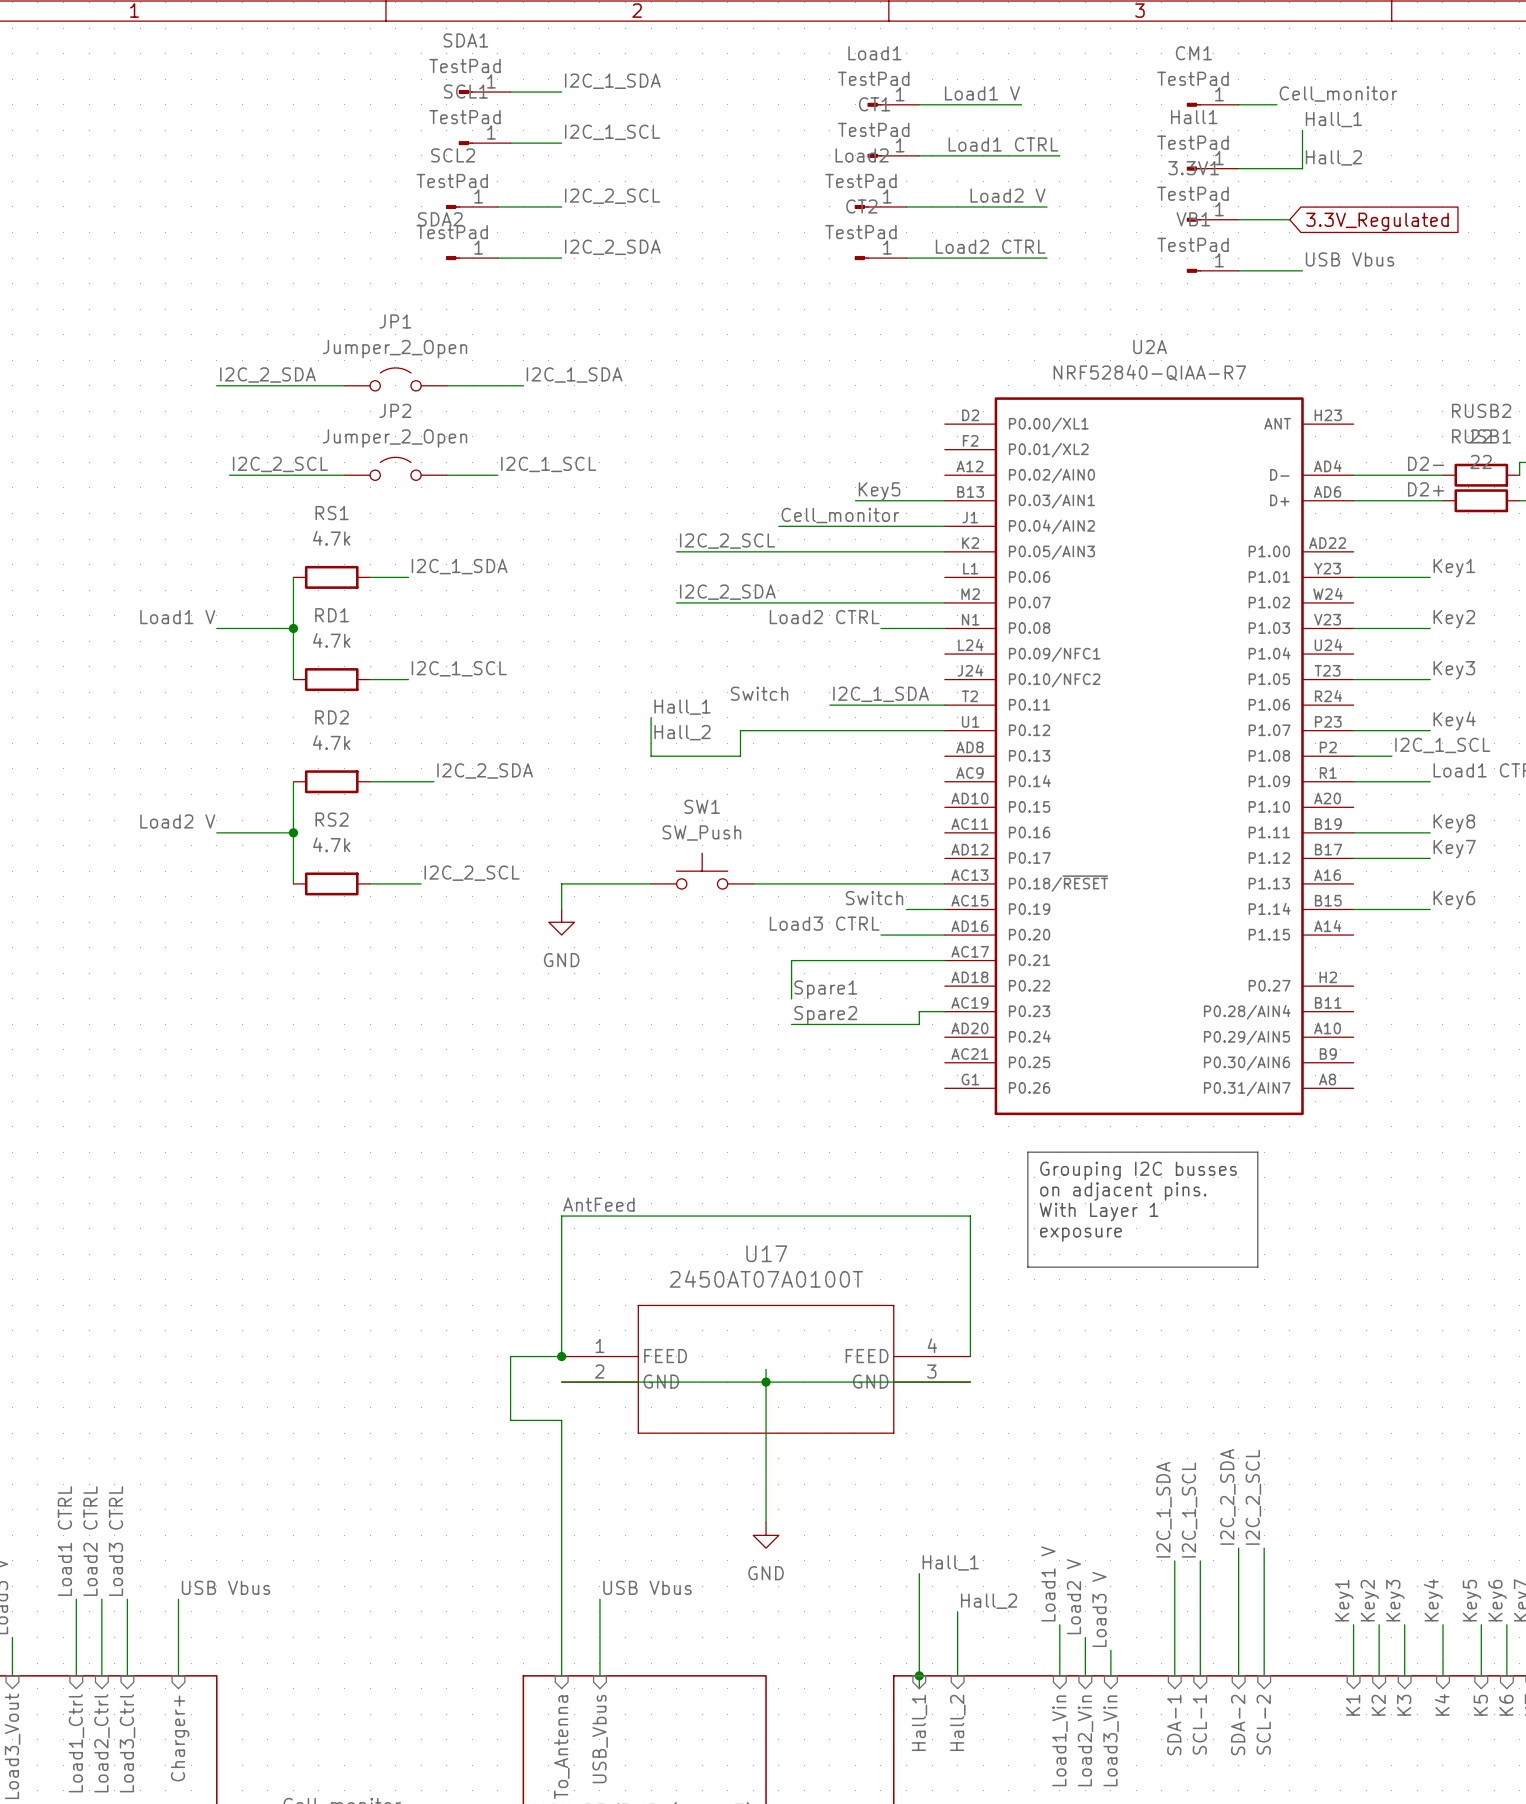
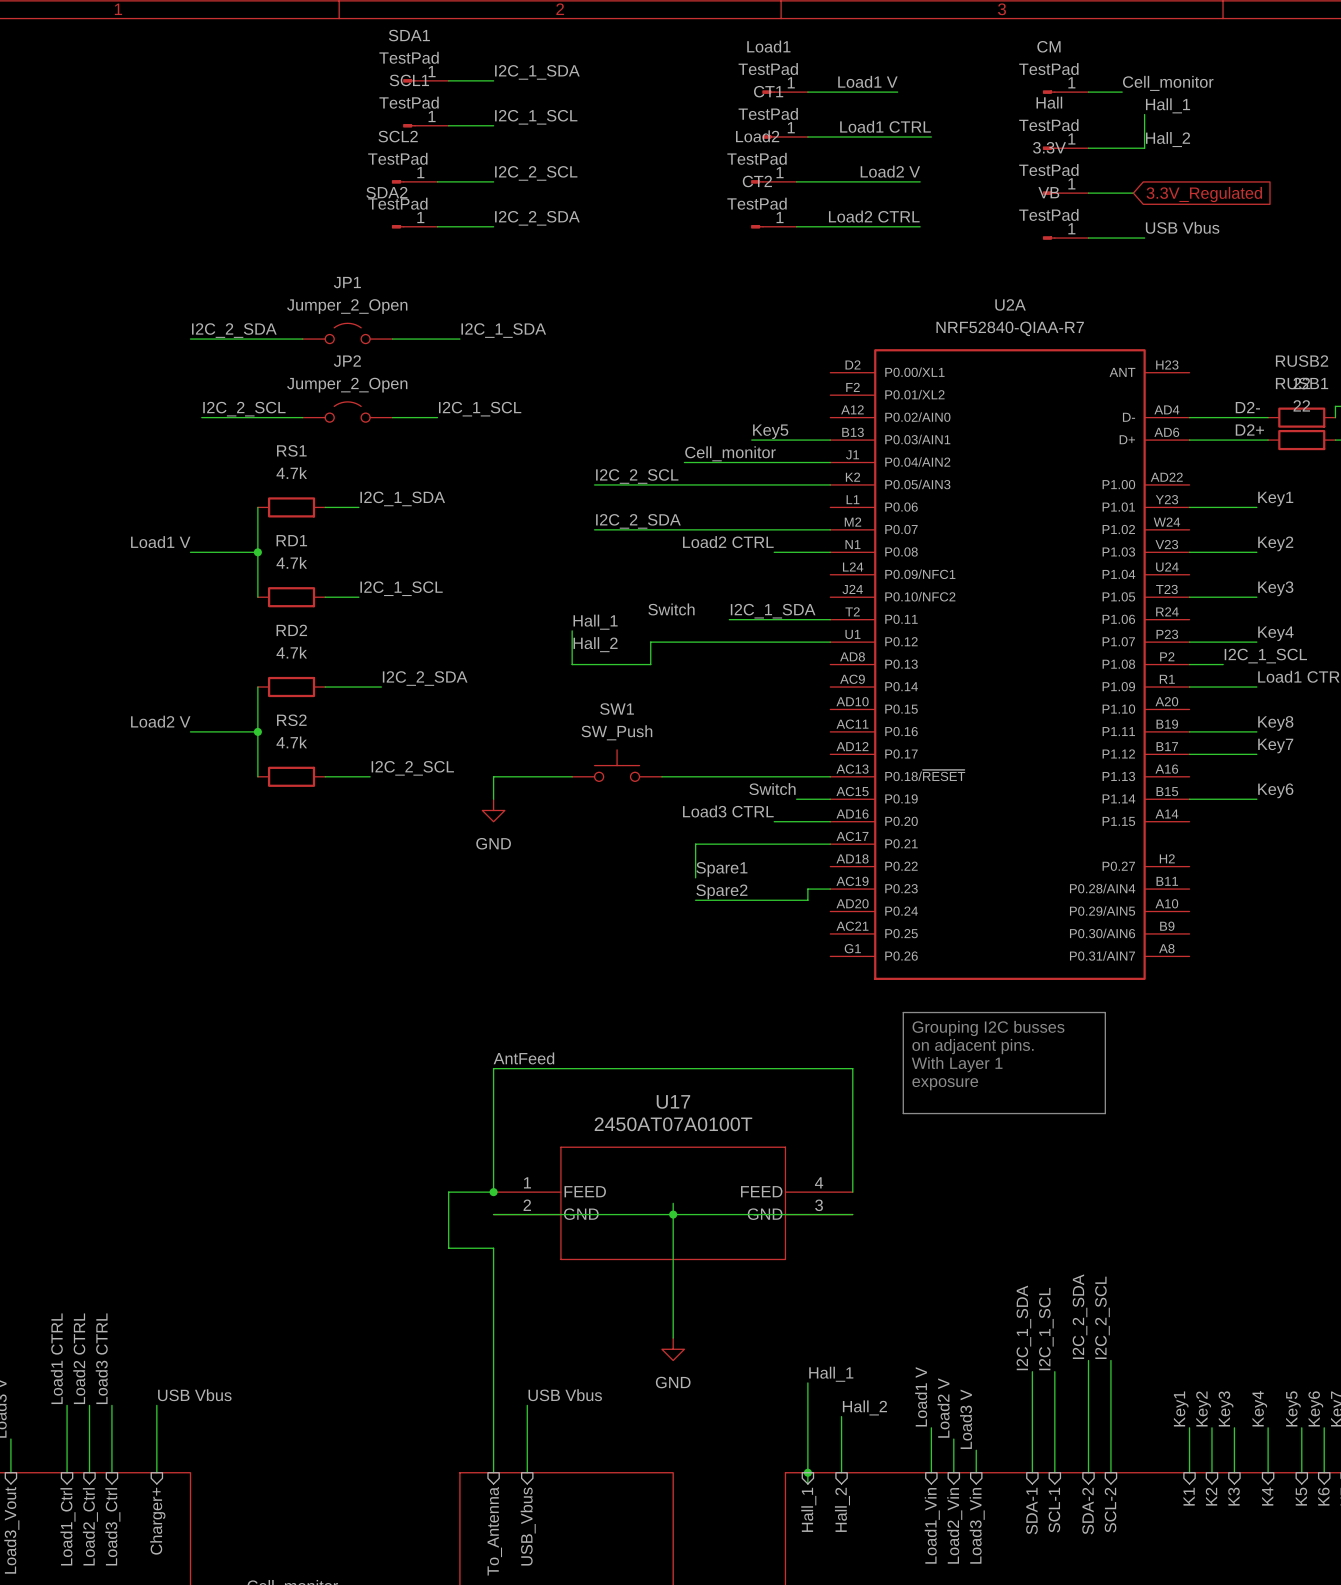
CM1 name: CM1 (1193, 53) -> CM (1048, 46)
Hall1 name: Hall1 (1194, 117) -> Hall (1049, 102)
3.3V1 name: 3.3V1 (1193, 168) -> 3.3V (1049, 147)
VB1 name: VB1 (1193, 219) -> VB (1048, 192)

